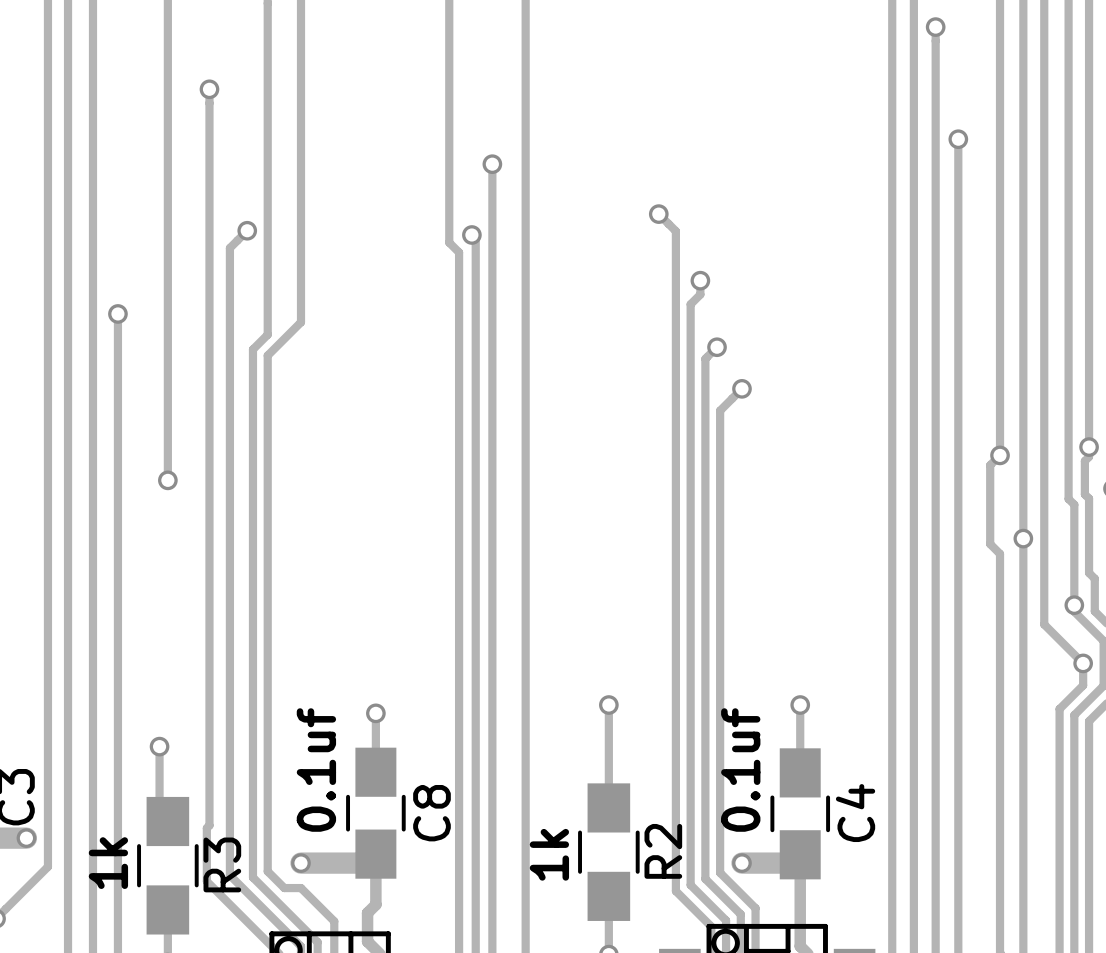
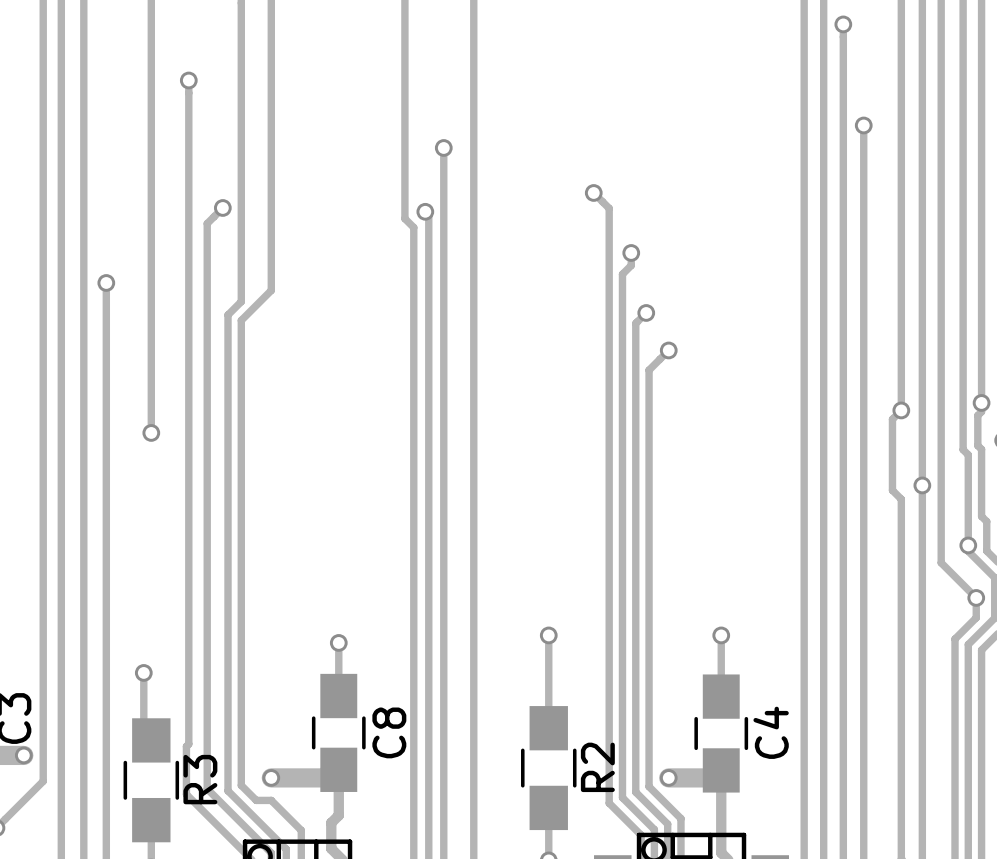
text: 0.1uf (316, 770) -> none
text: 0.1uf (740, 770) -> none
text: 1k (549, 854) -> none
text: 1k (108, 863) -> none

